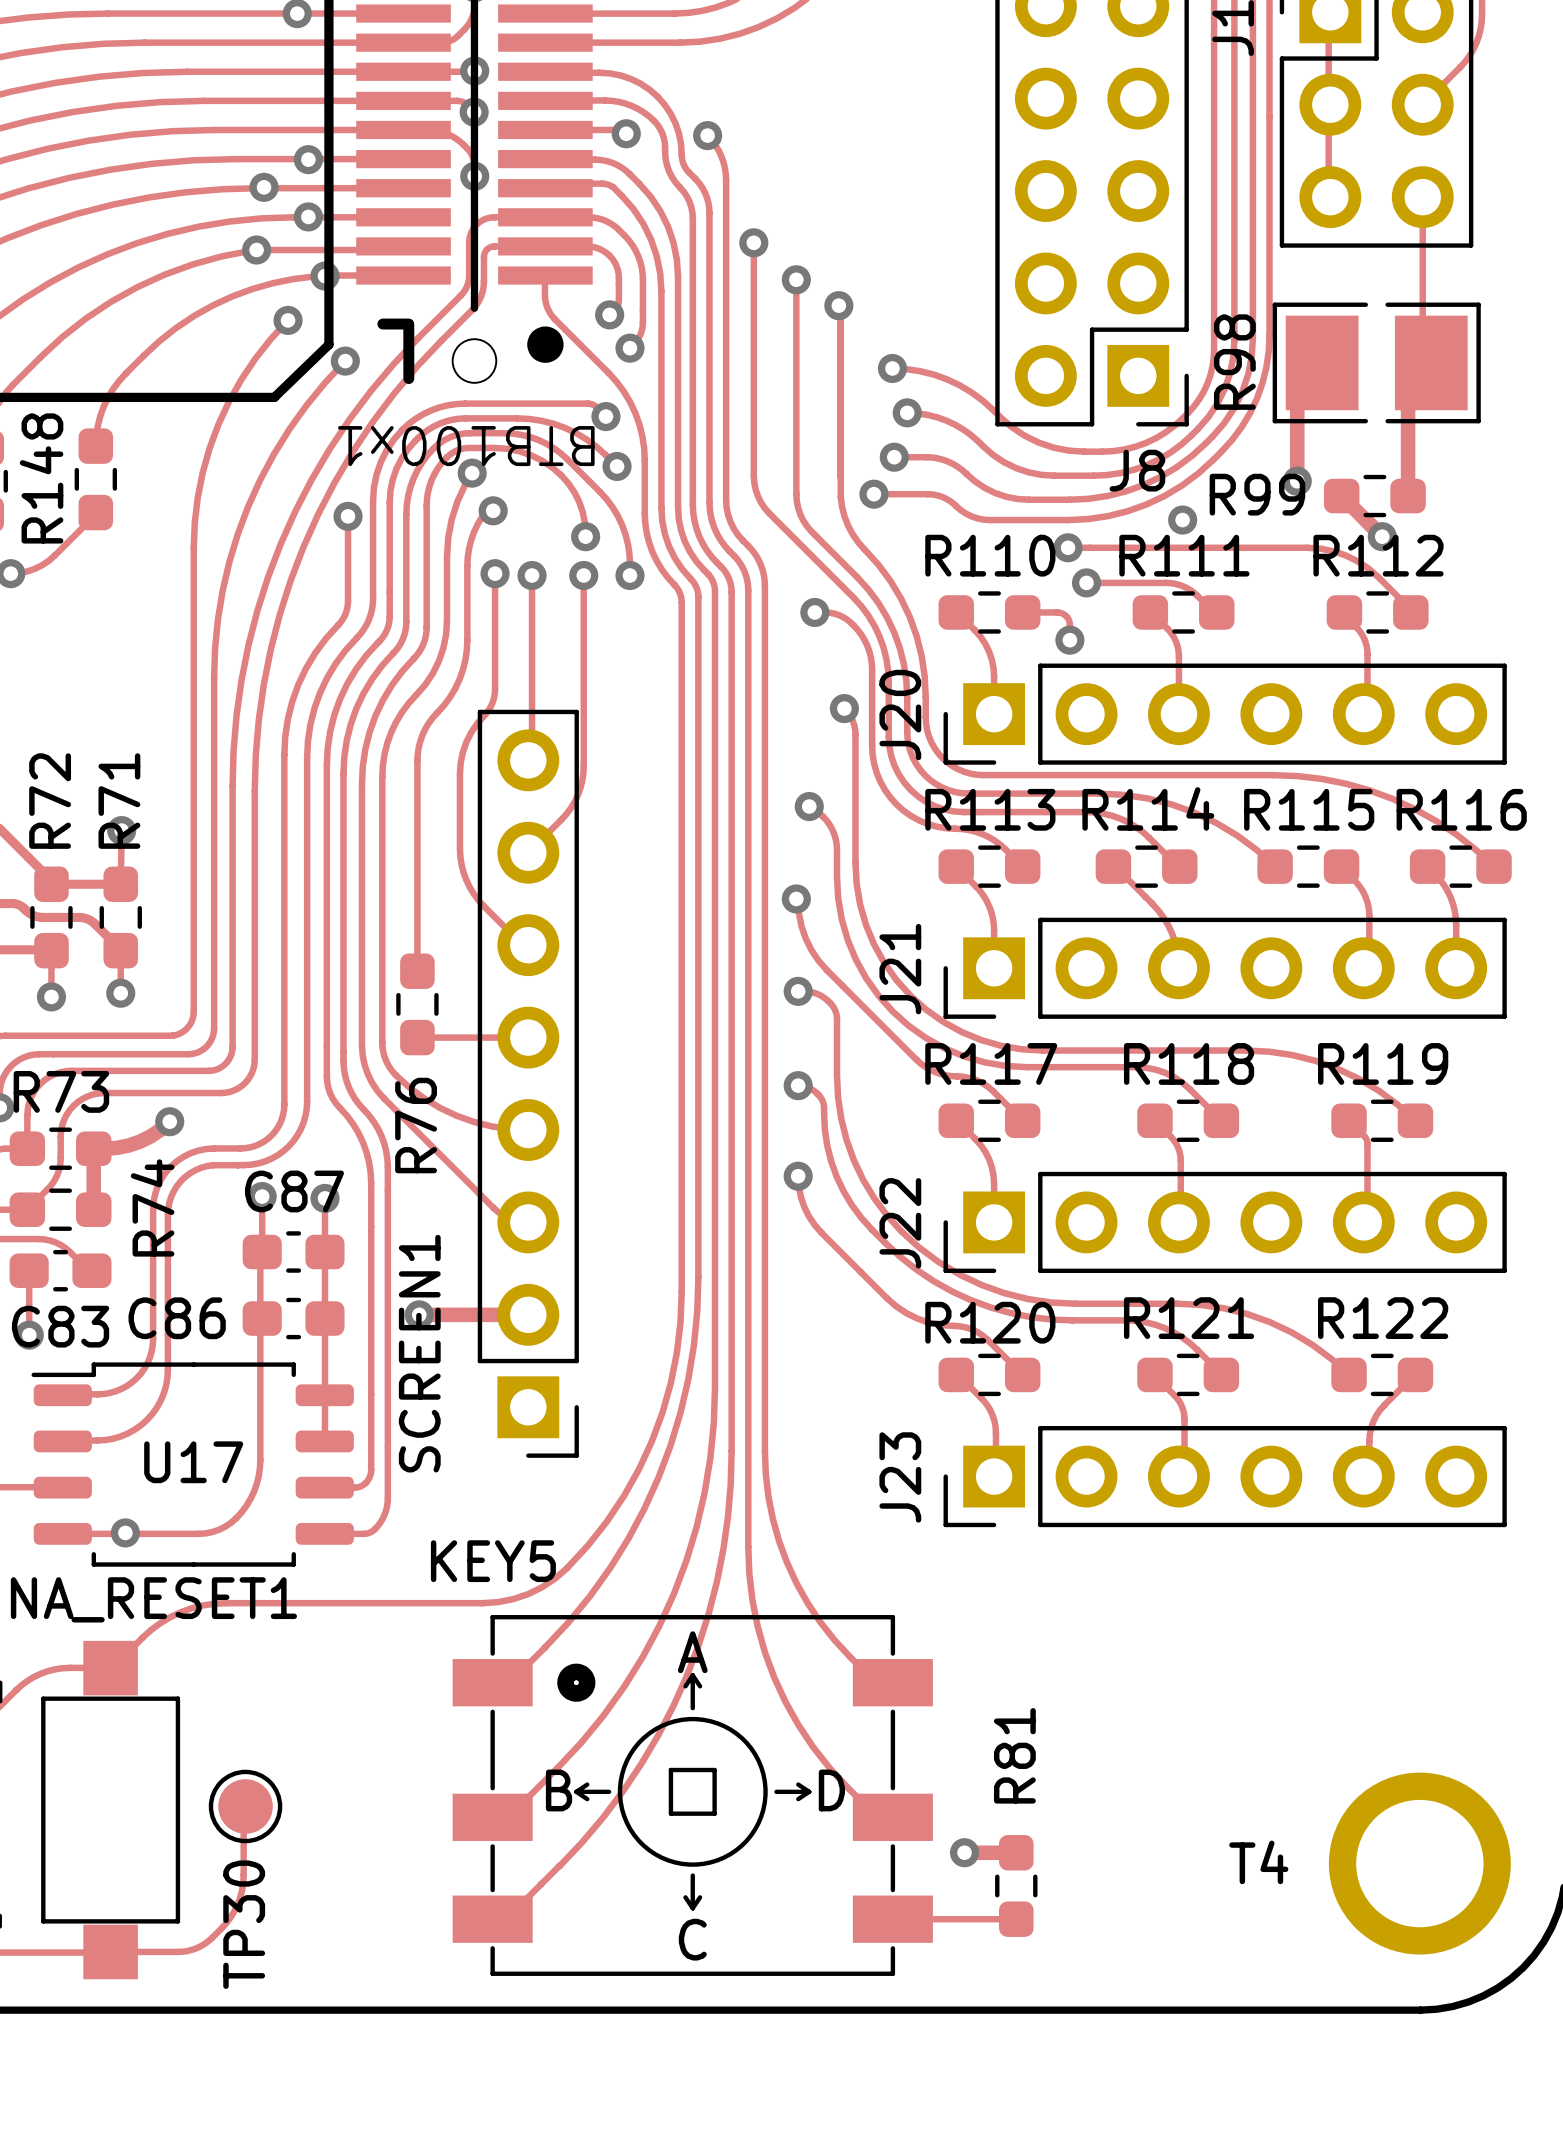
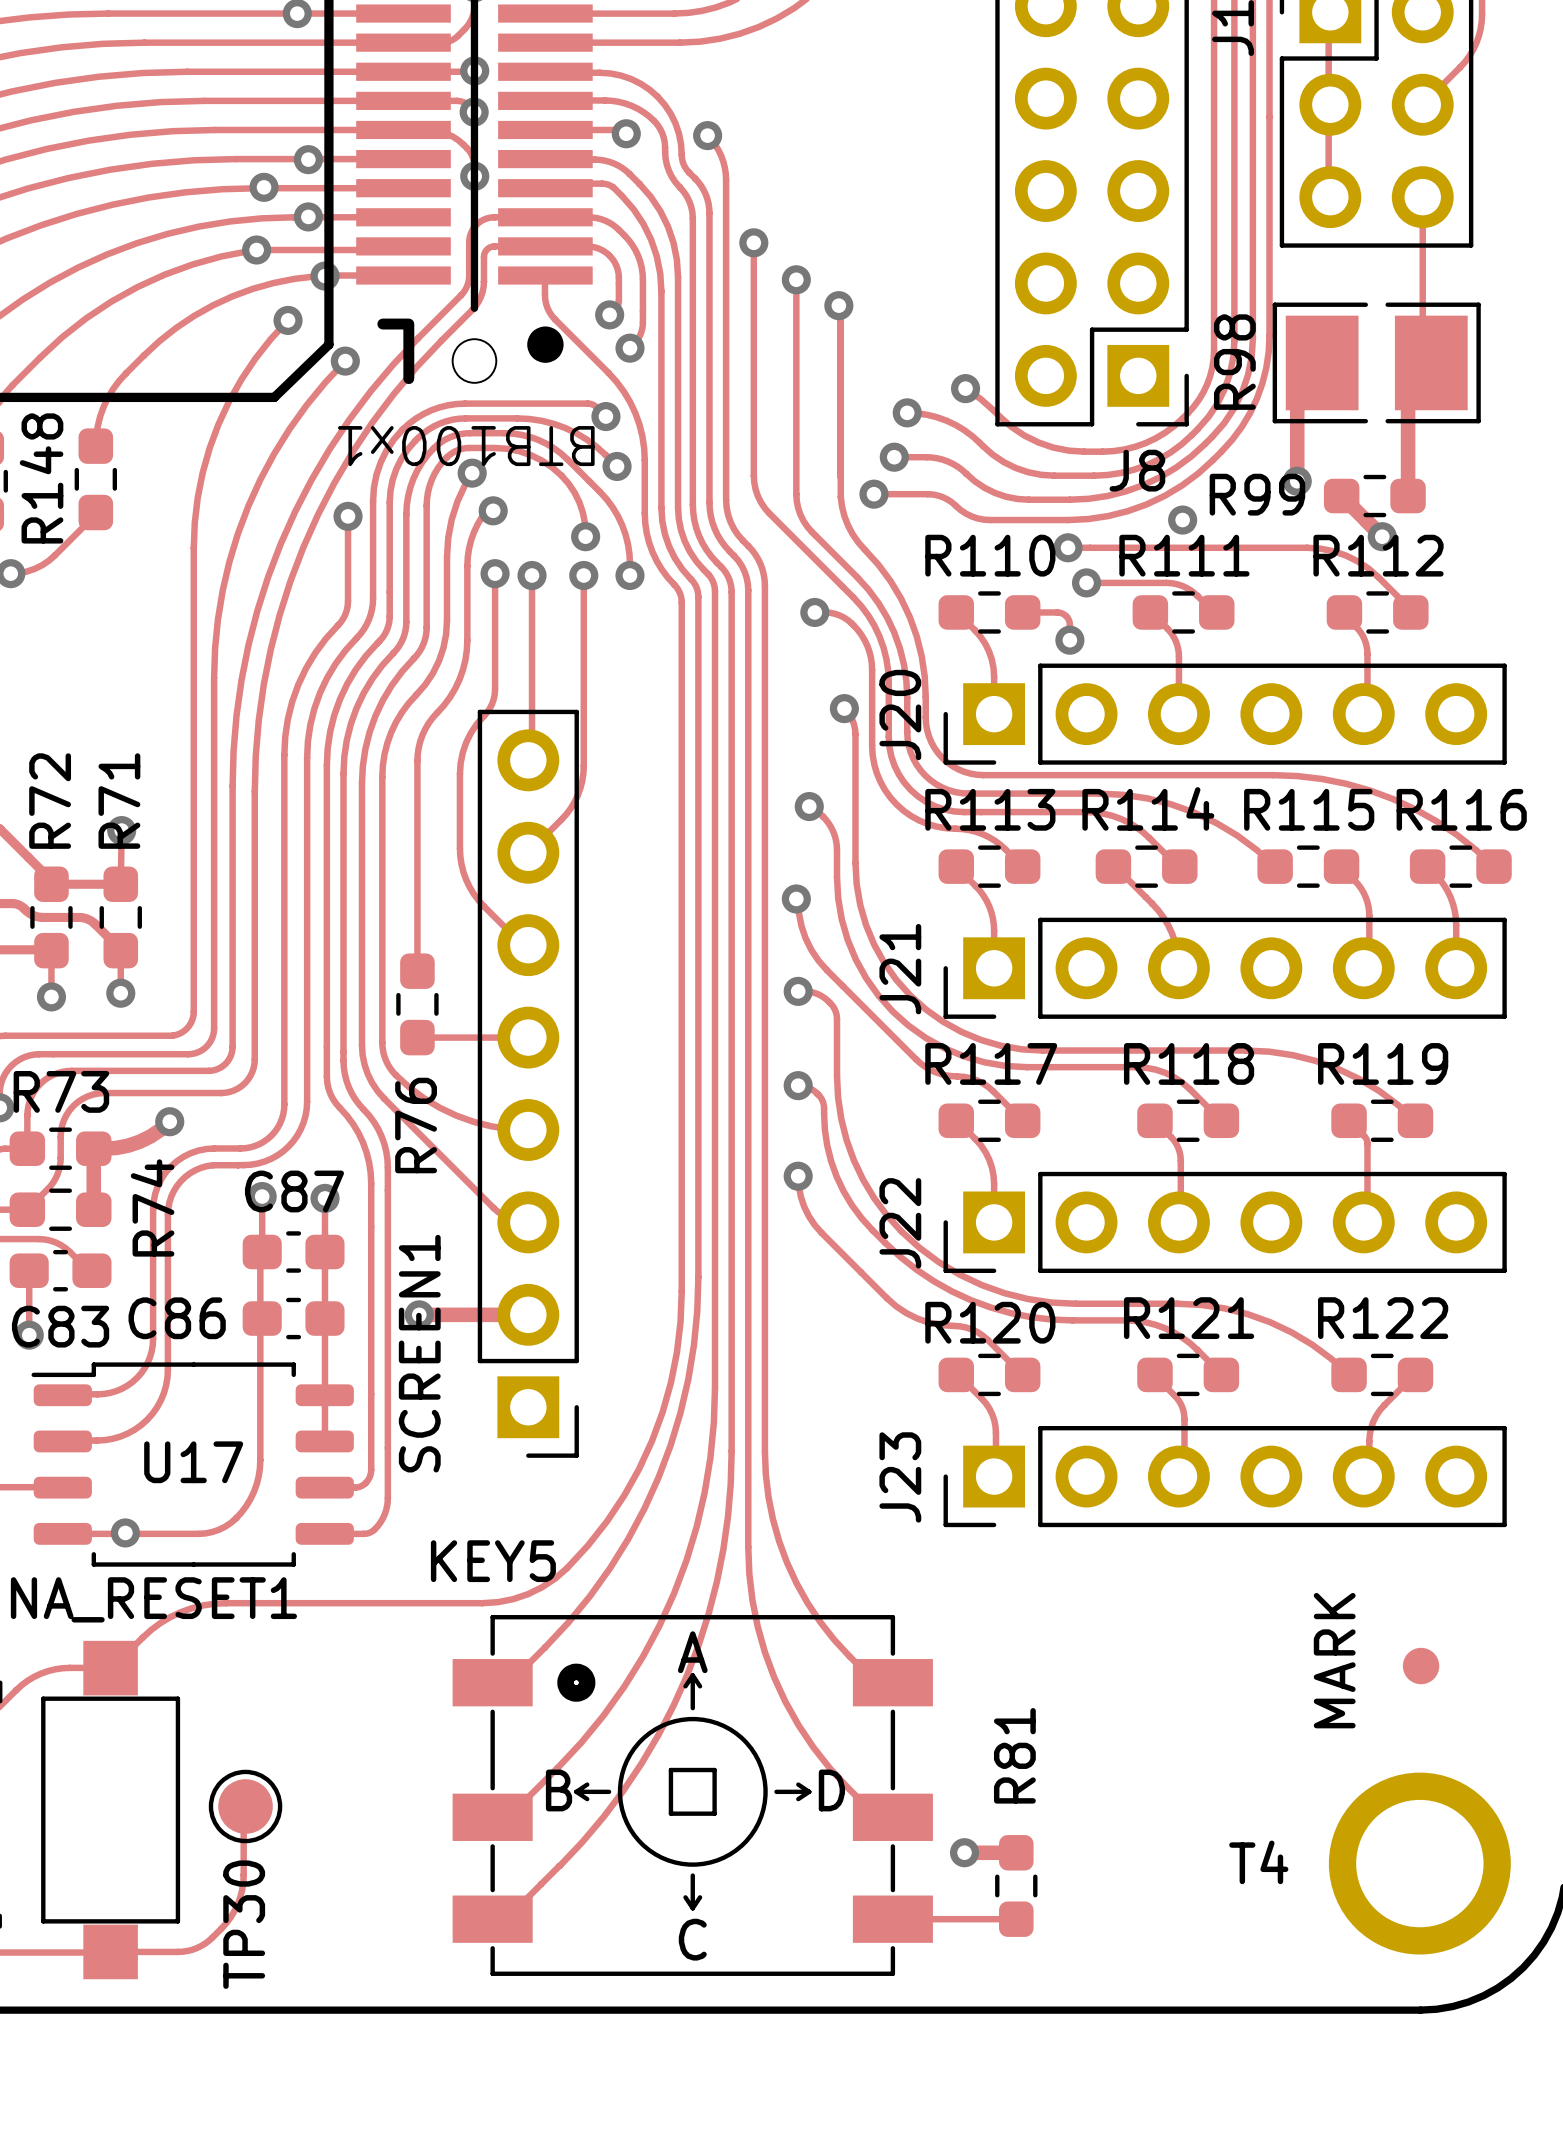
track: (892, 368) (920, 371) (947, 379) (971, 392) (993, 410) -> (965, 388) (993, 410)
via position: (892, 368) -> (965, 388)
MARK: none -> (1421, 1666)

